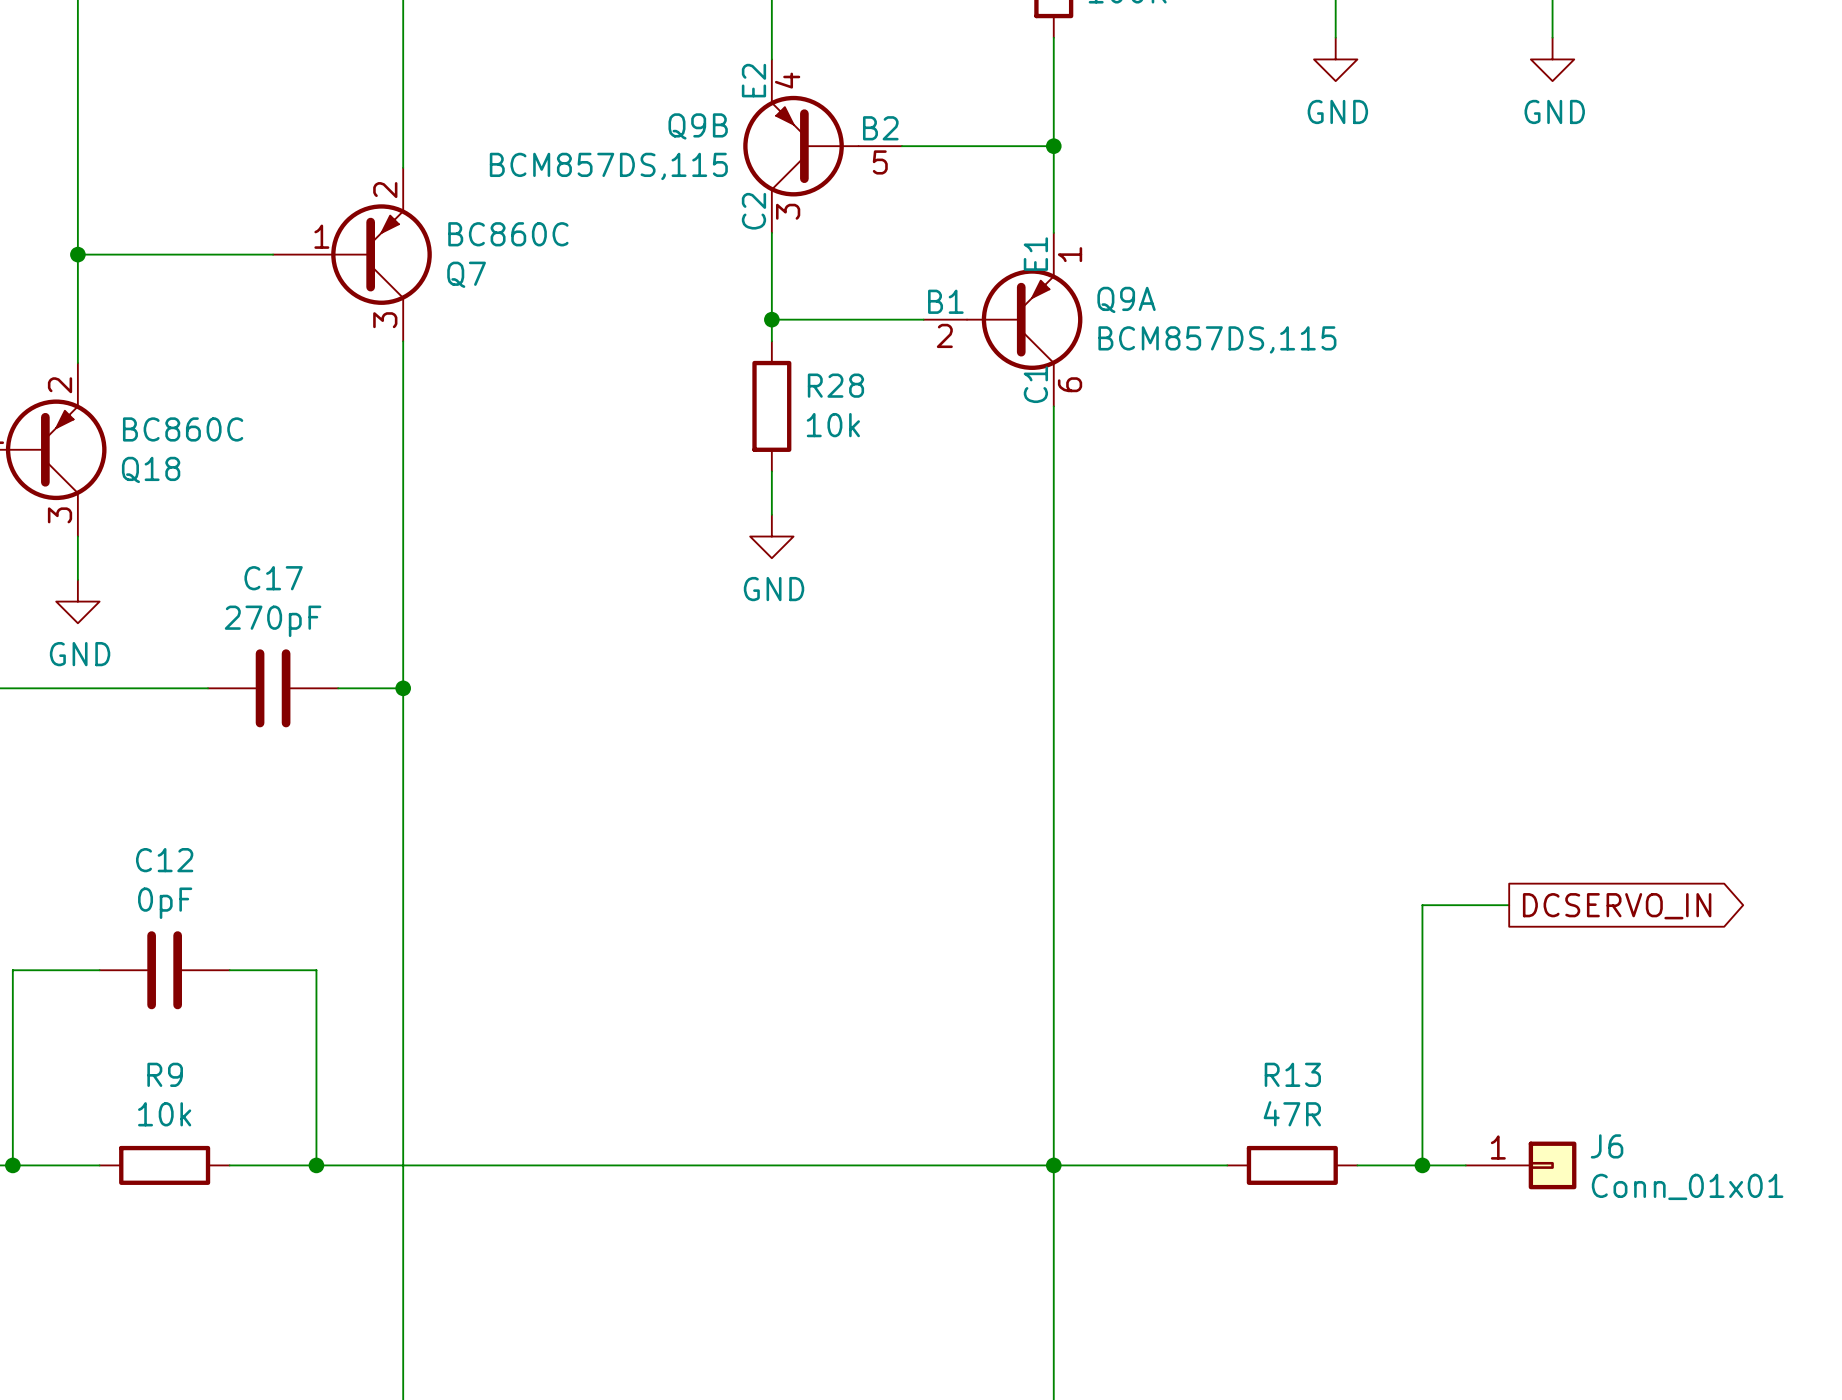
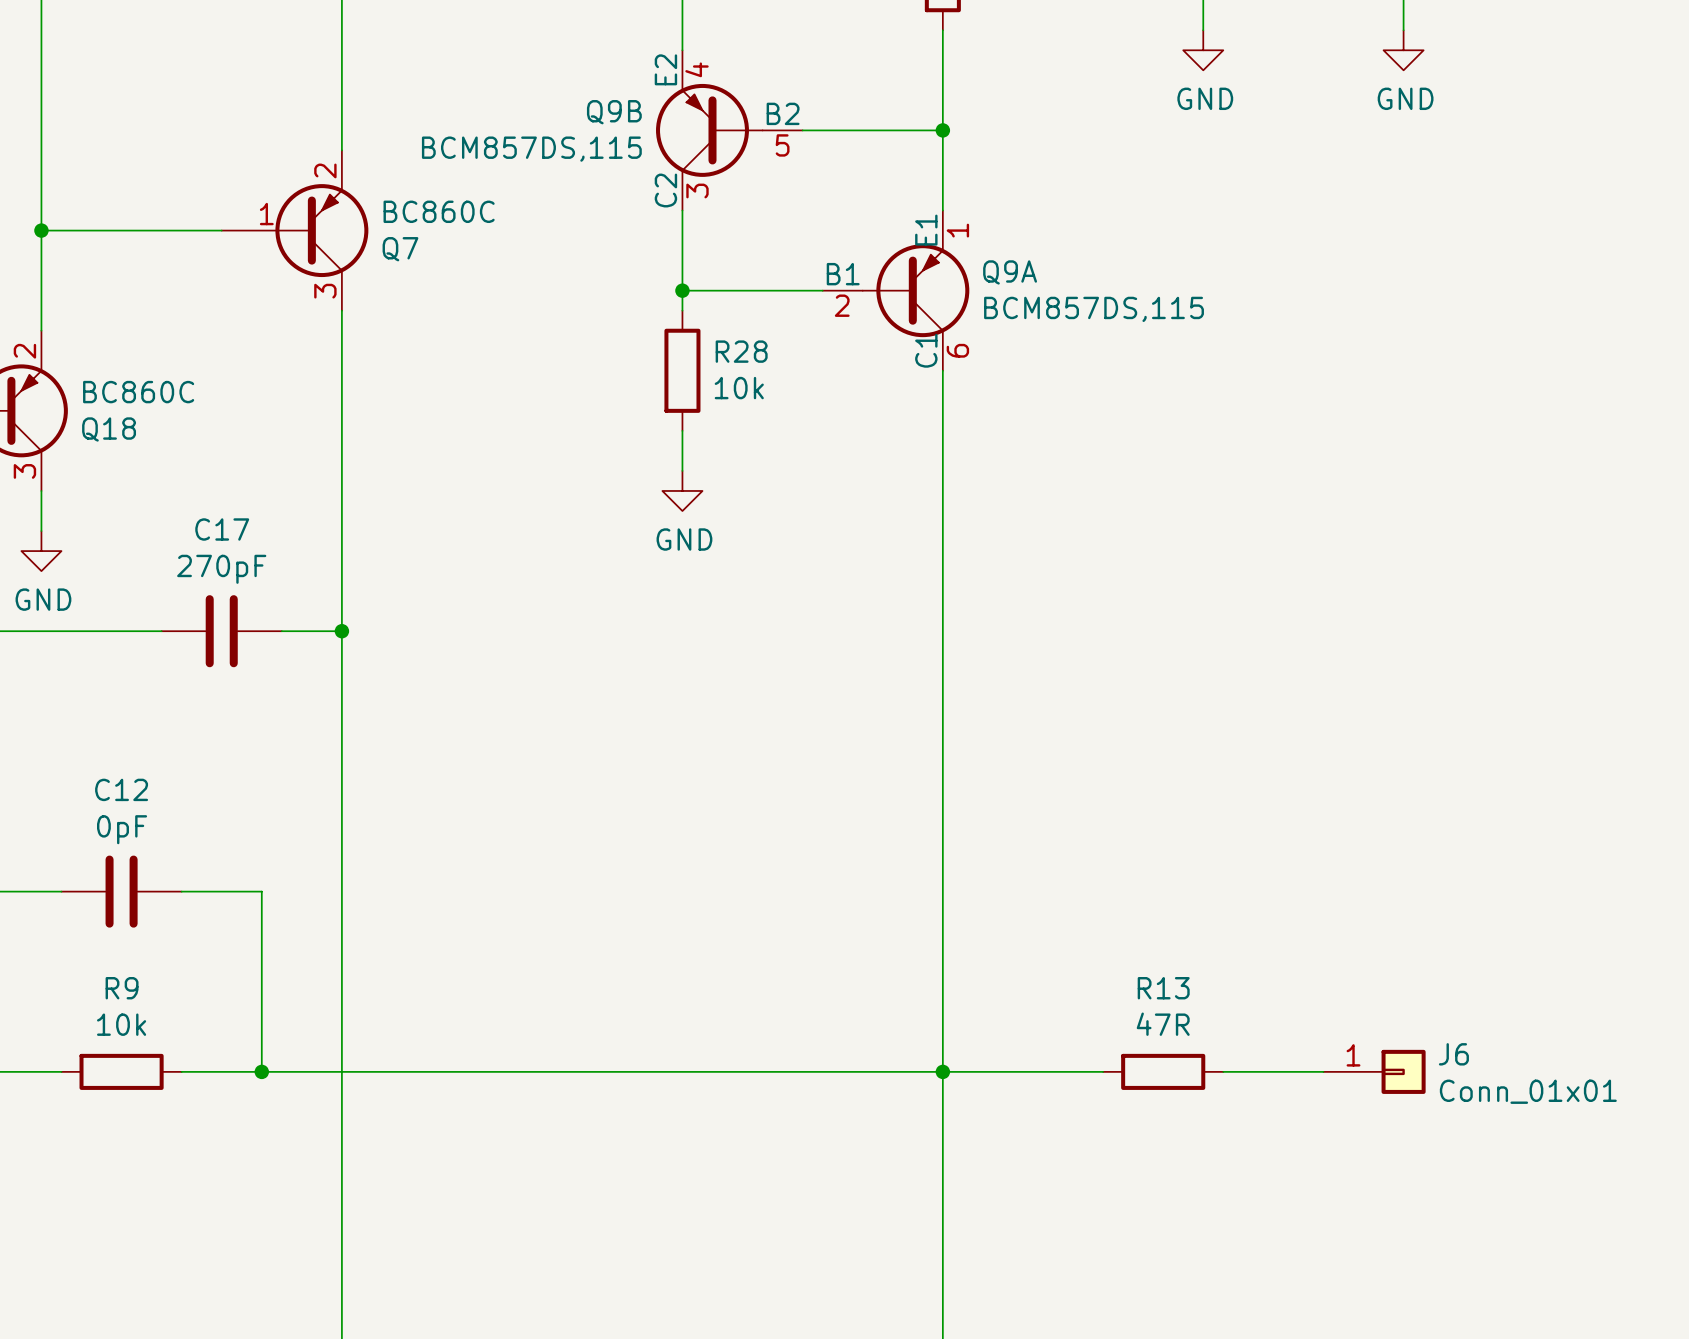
wire: (1509, 905) (1422, 905) (1422, 1165) -> none
global label: DCSERVO_IN (1617, 906) -> none
junction: (1422, 1165) -> none

